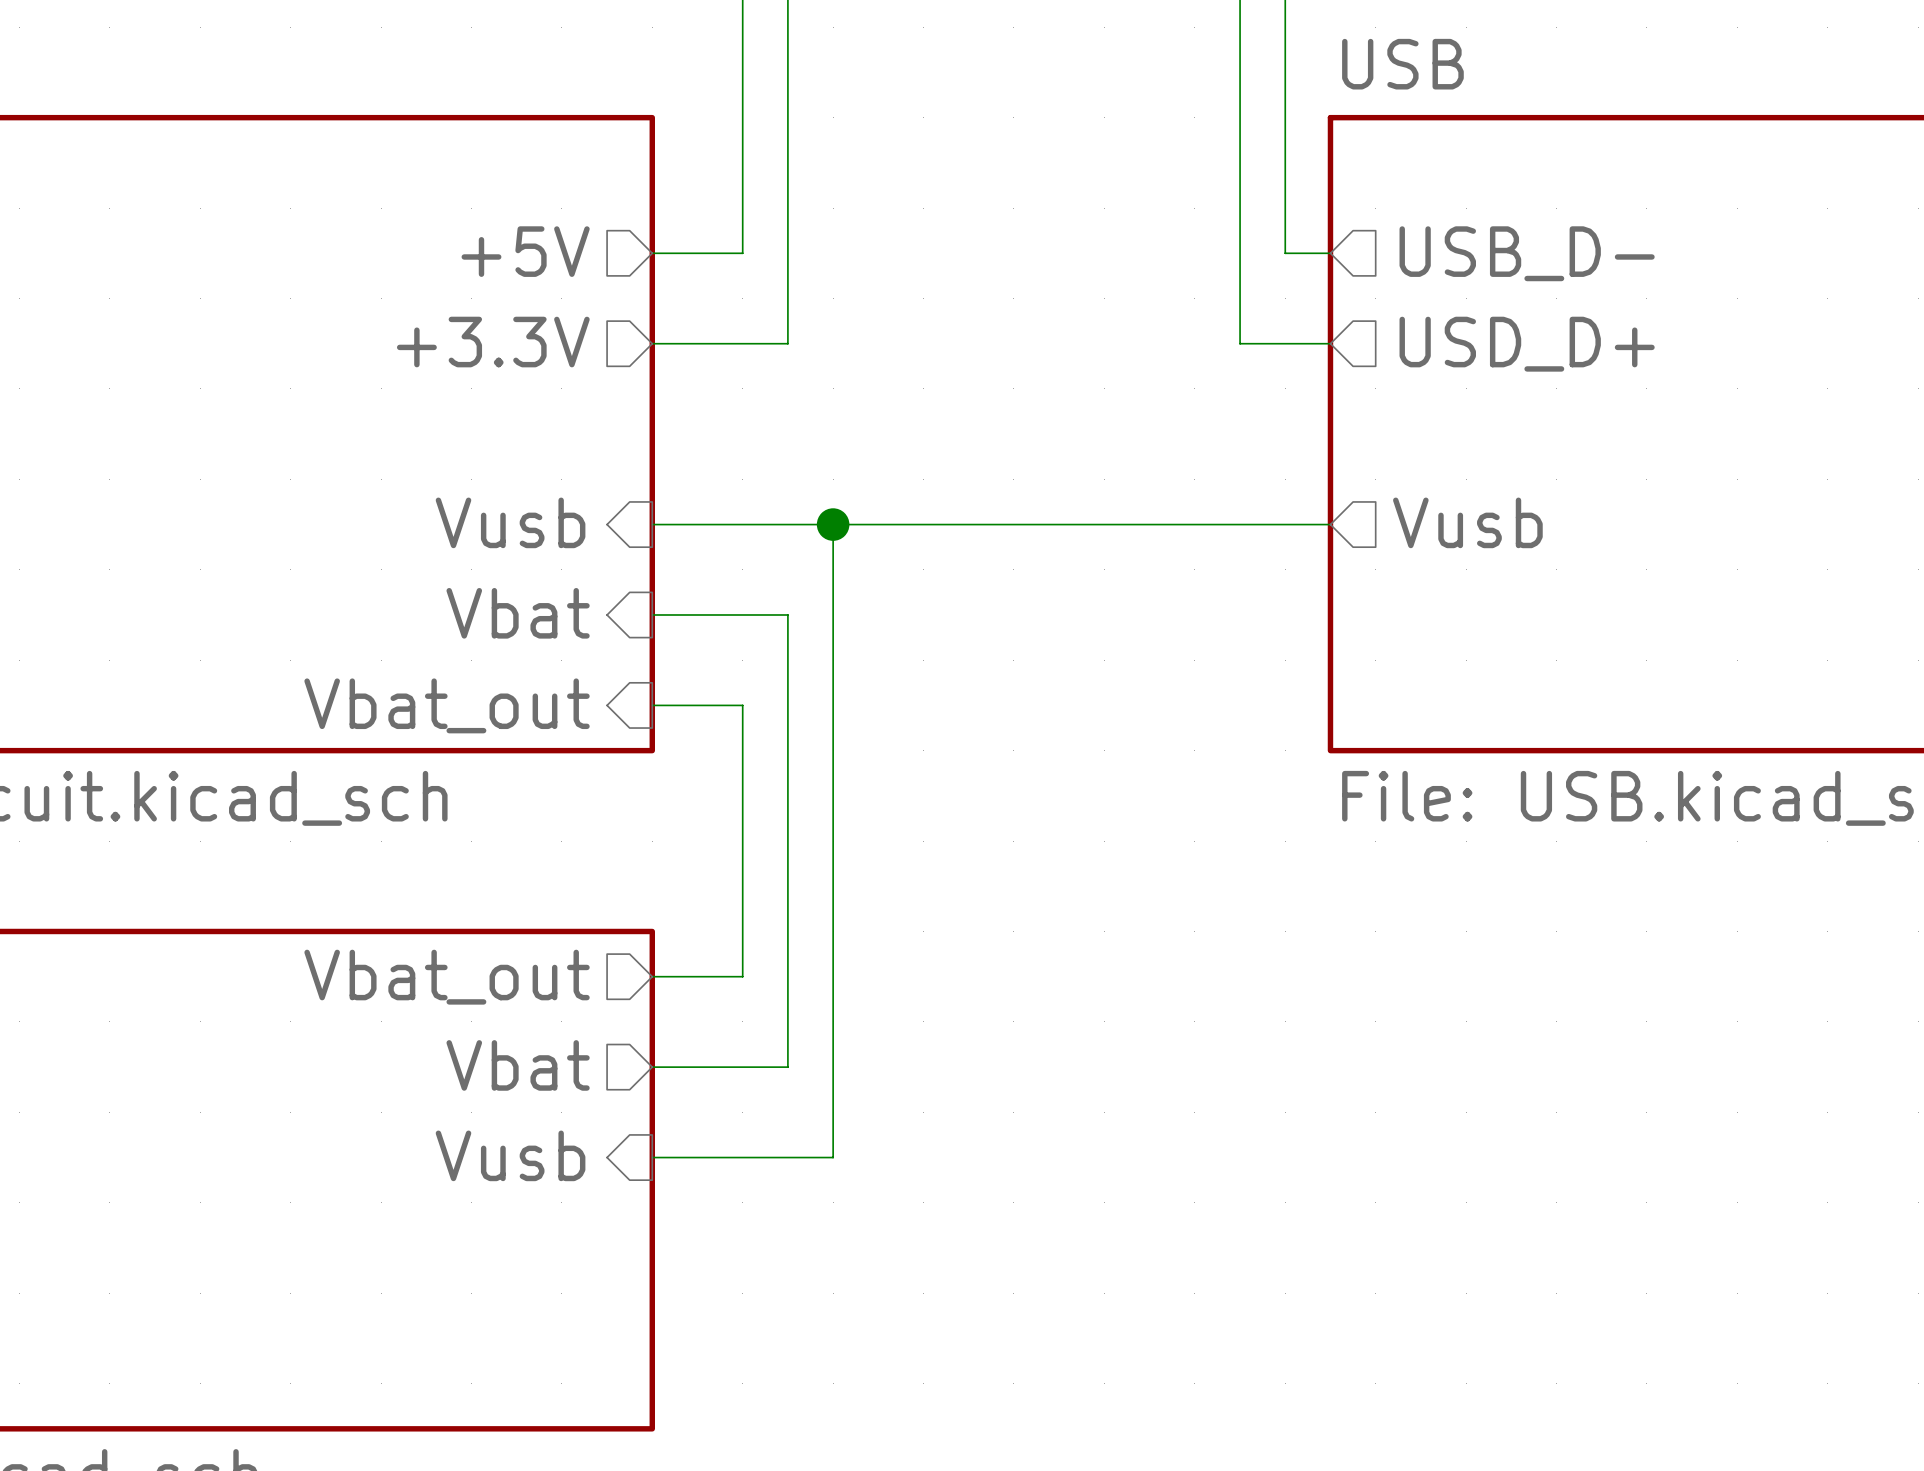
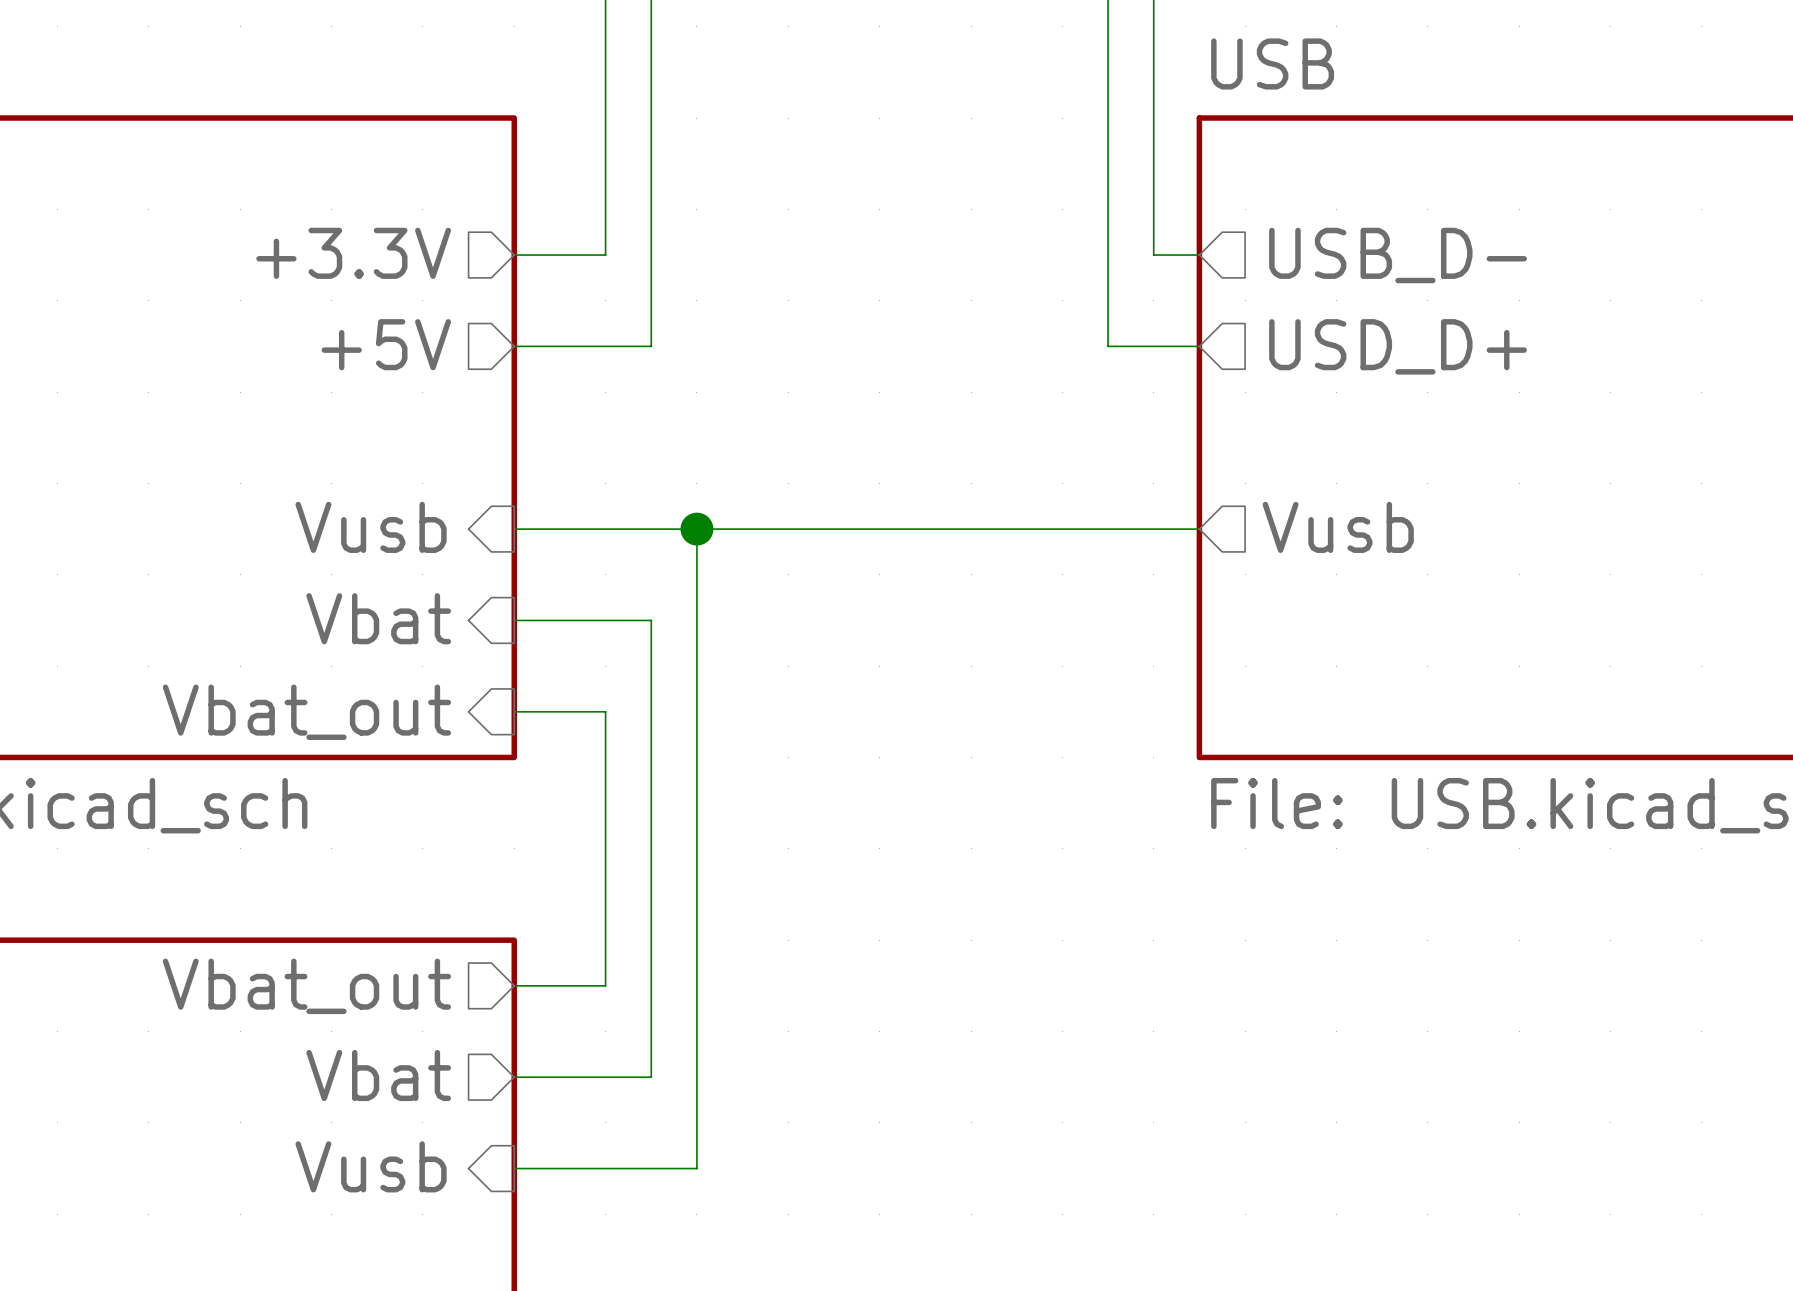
sheet pin: +5V (525, 251) -> +3.3V (353, 253)
sheet pin: +3.3V (493, 342) -> +5V (386, 344)

